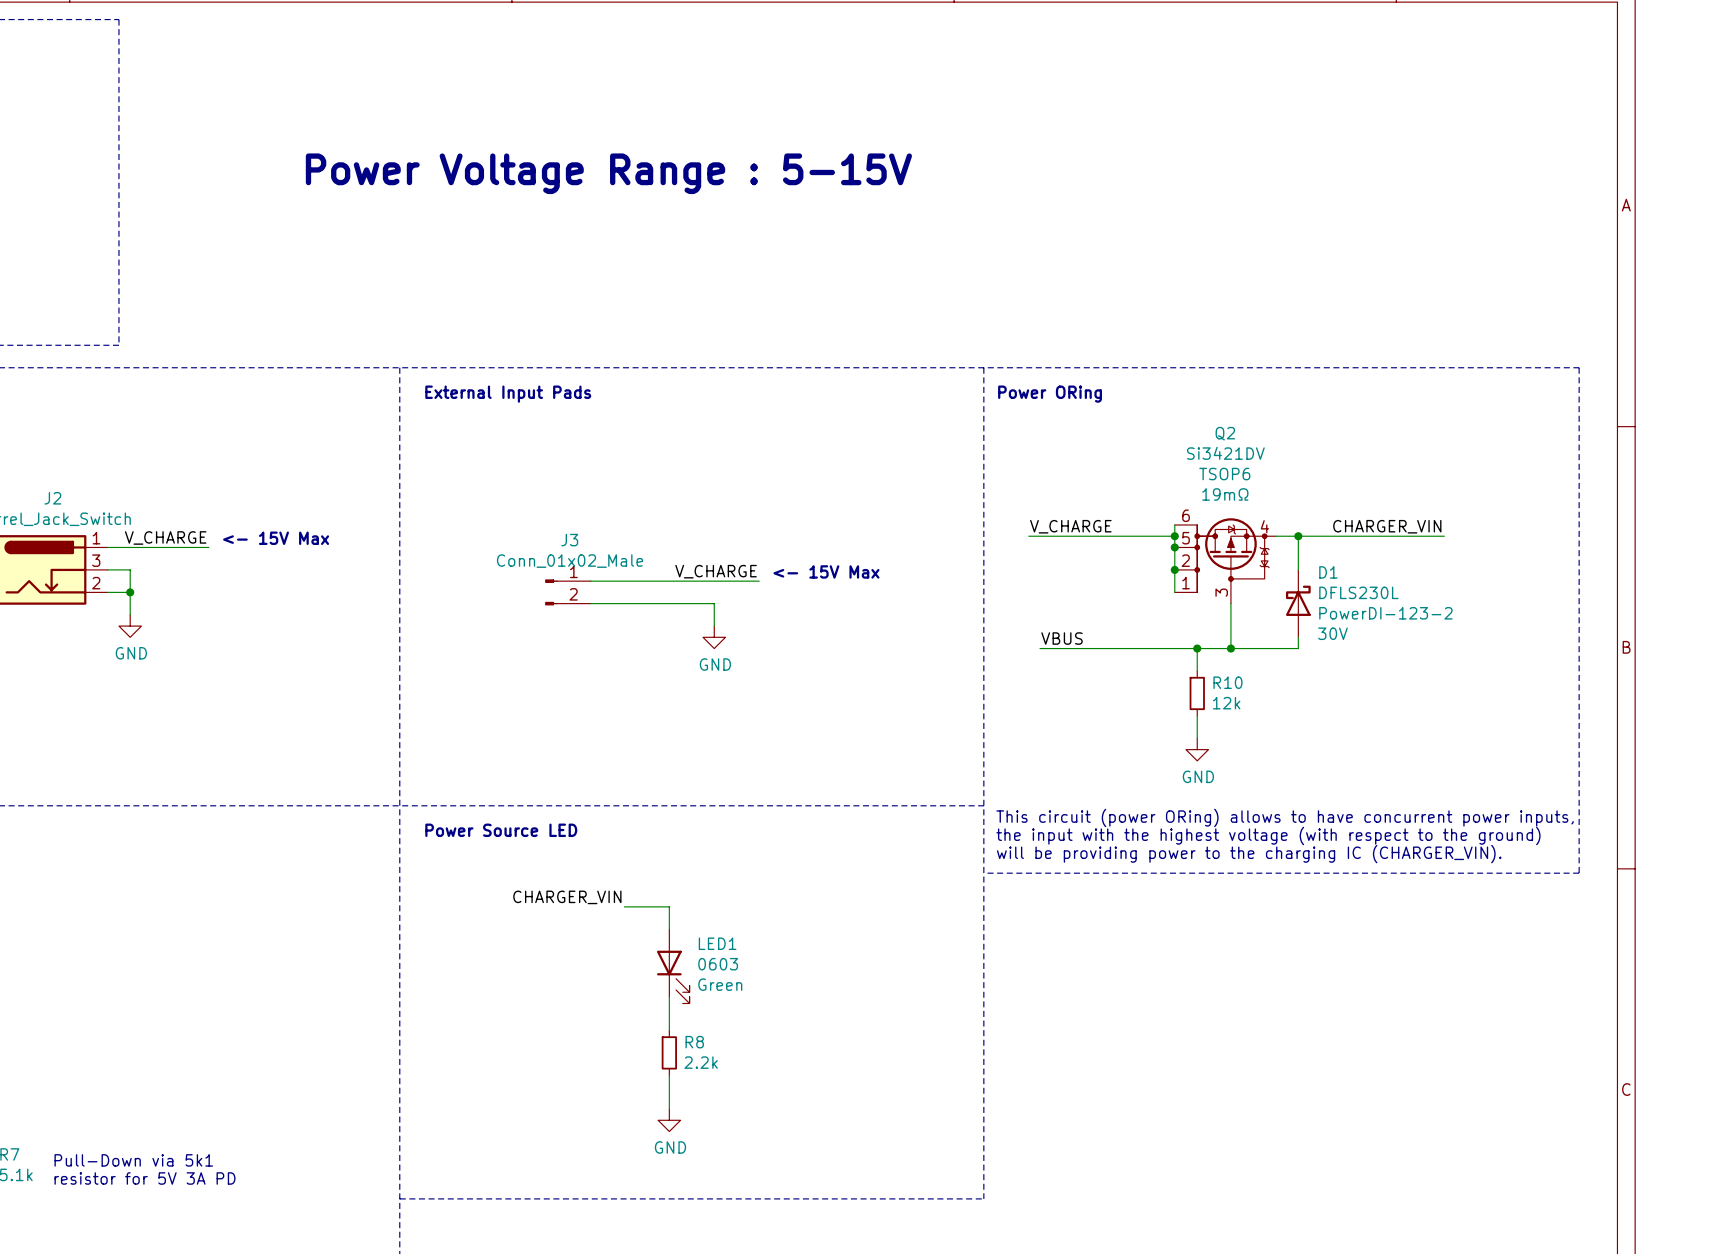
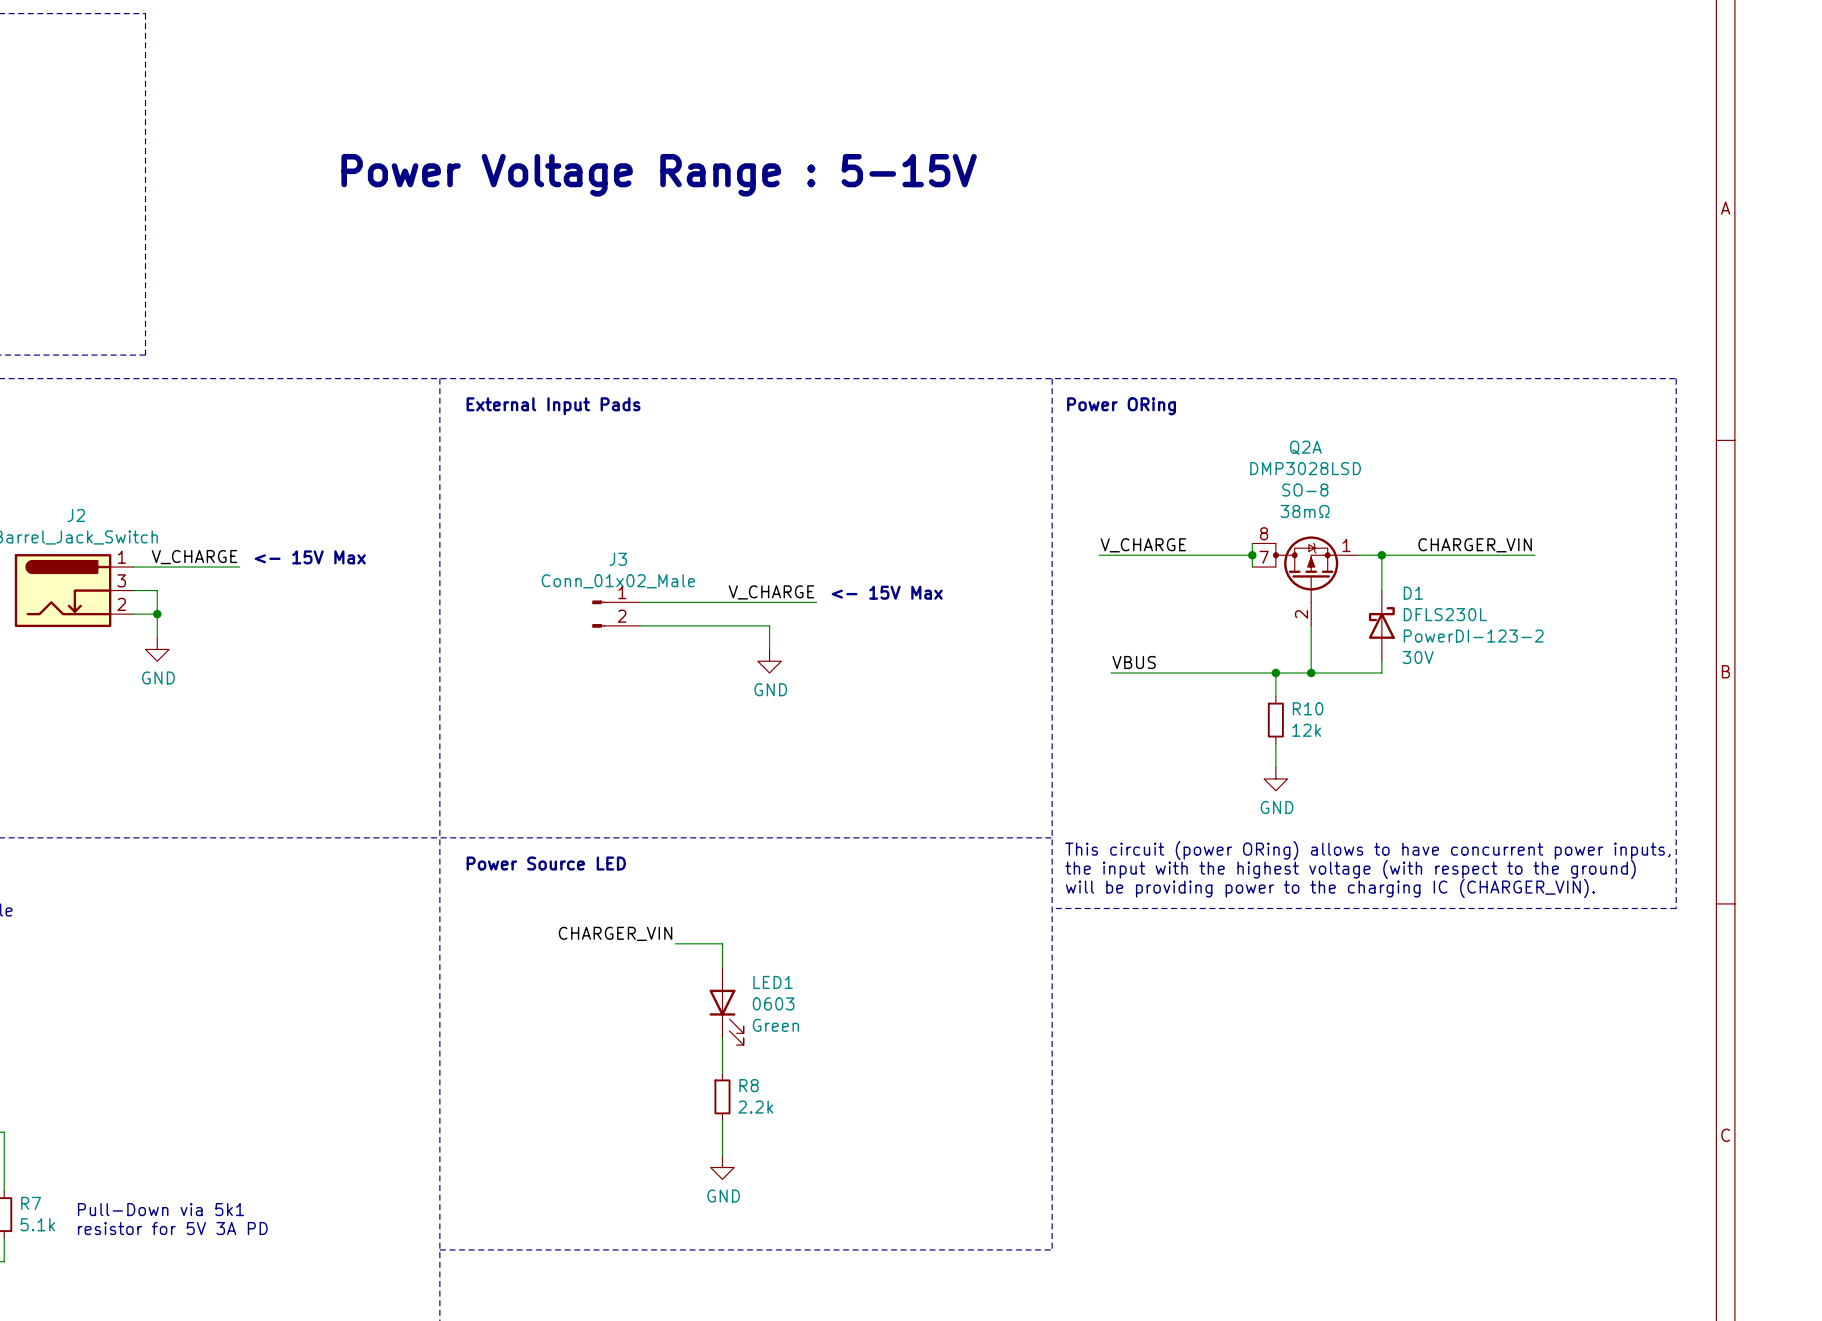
wire: (1174, 547) (1174, 592) -> none
junction: (1174, 547) -> none
Q2: Si3421DV (1225, 560) -> none
Q2A: none -> DMP3028LSD (1305, 581)
junction: (1174, 569) -> none

